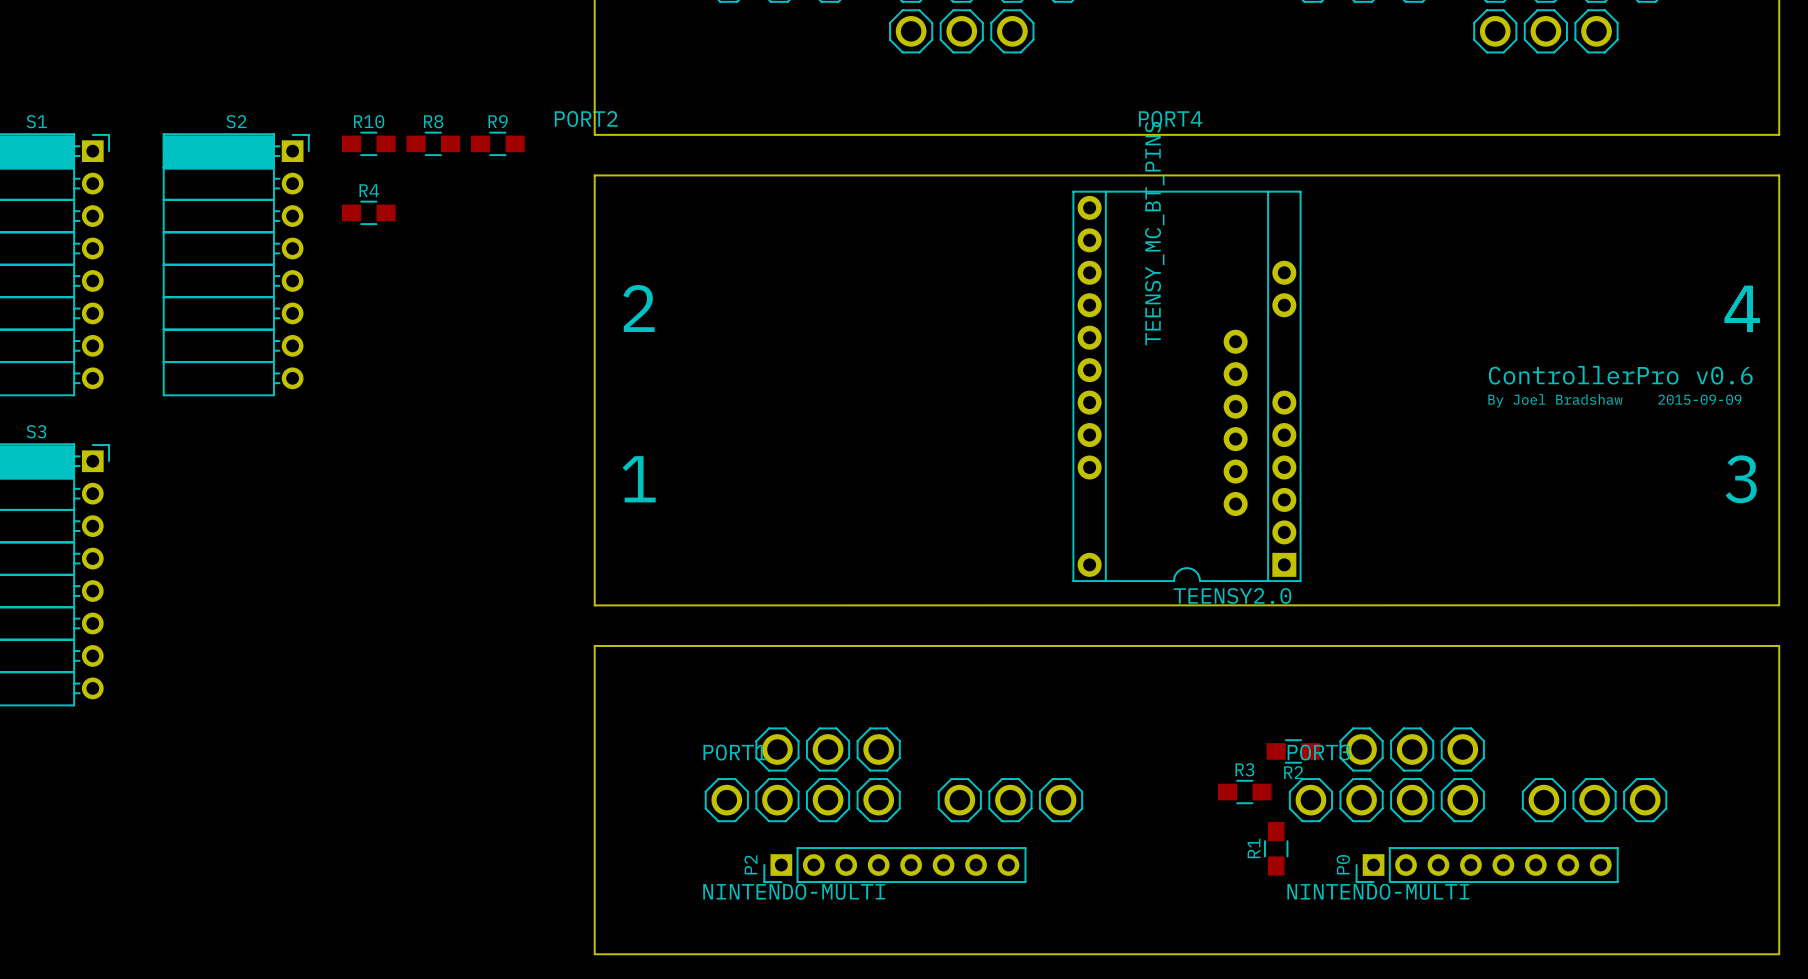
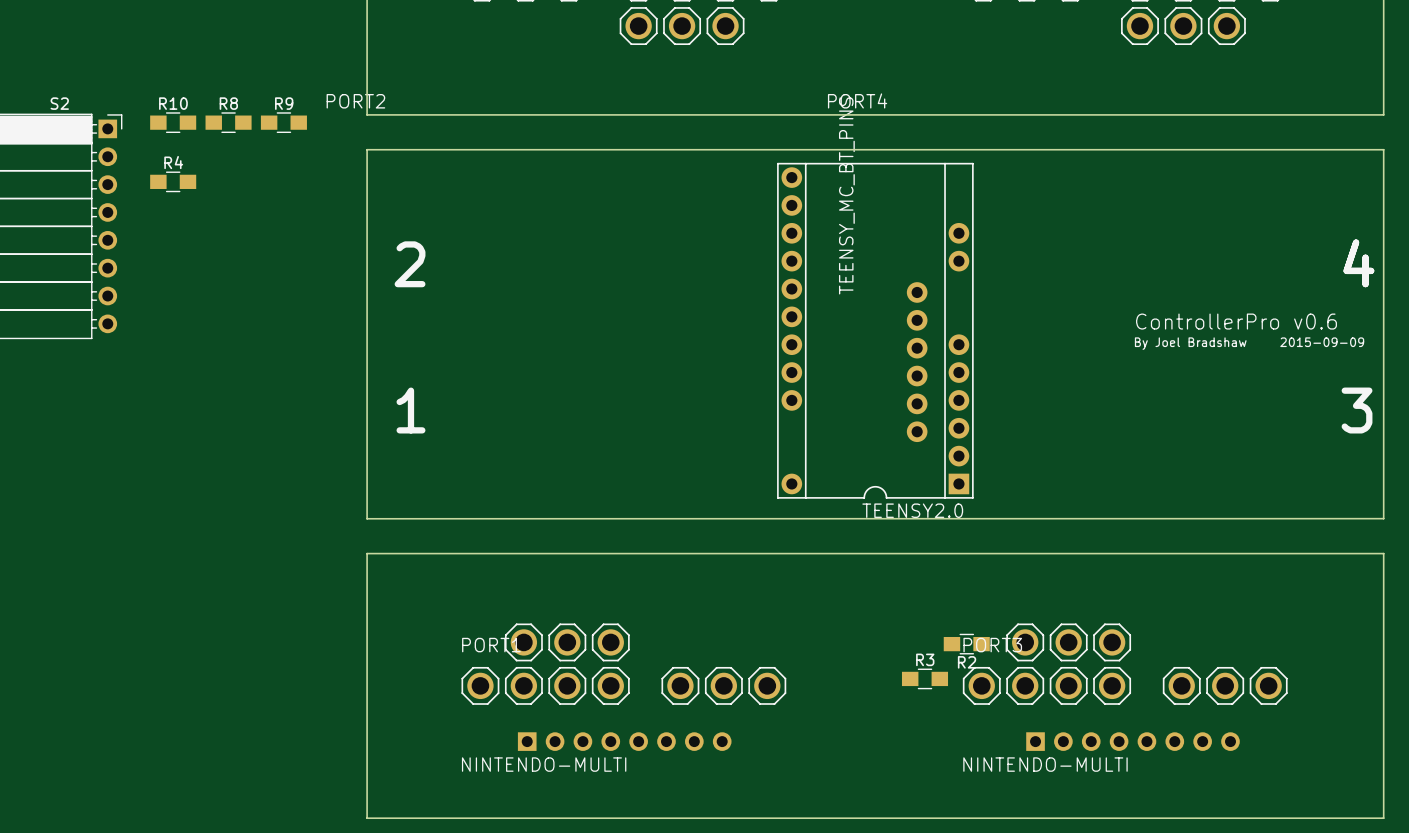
R1: (1276, 848) -> none
P2 side: top (894, 865) -> bottom (624, 741)
P0 side: top (1487, 865) -> bottom (1133, 741)

